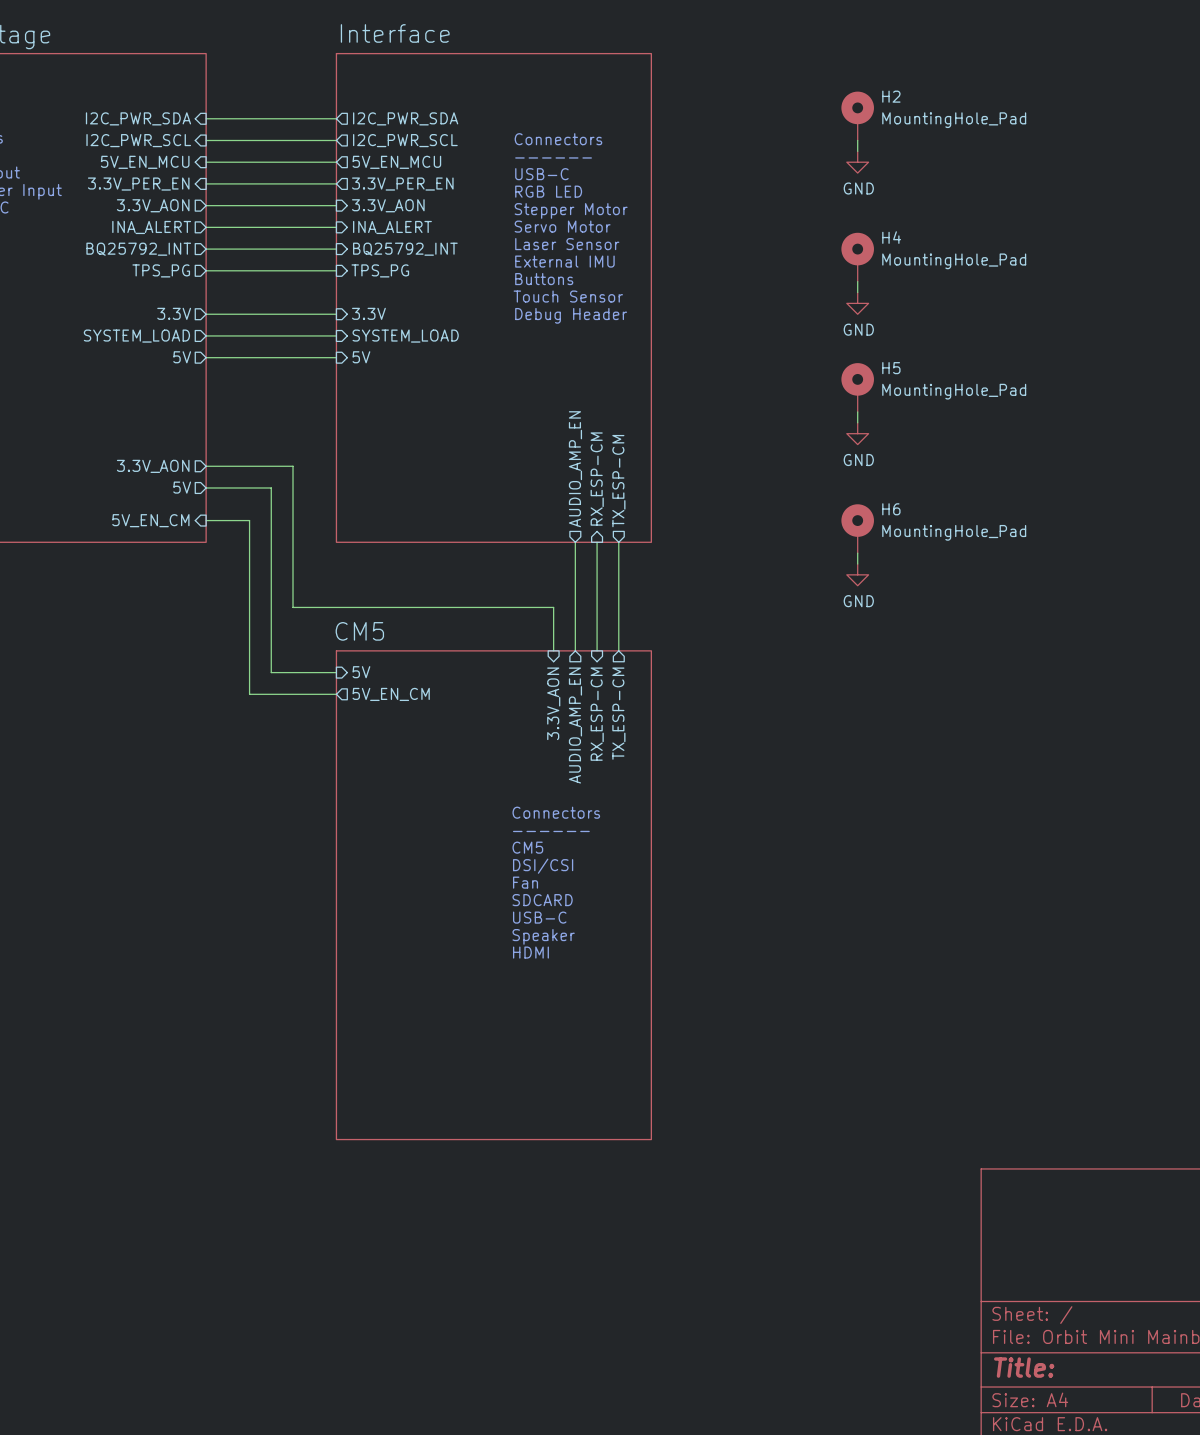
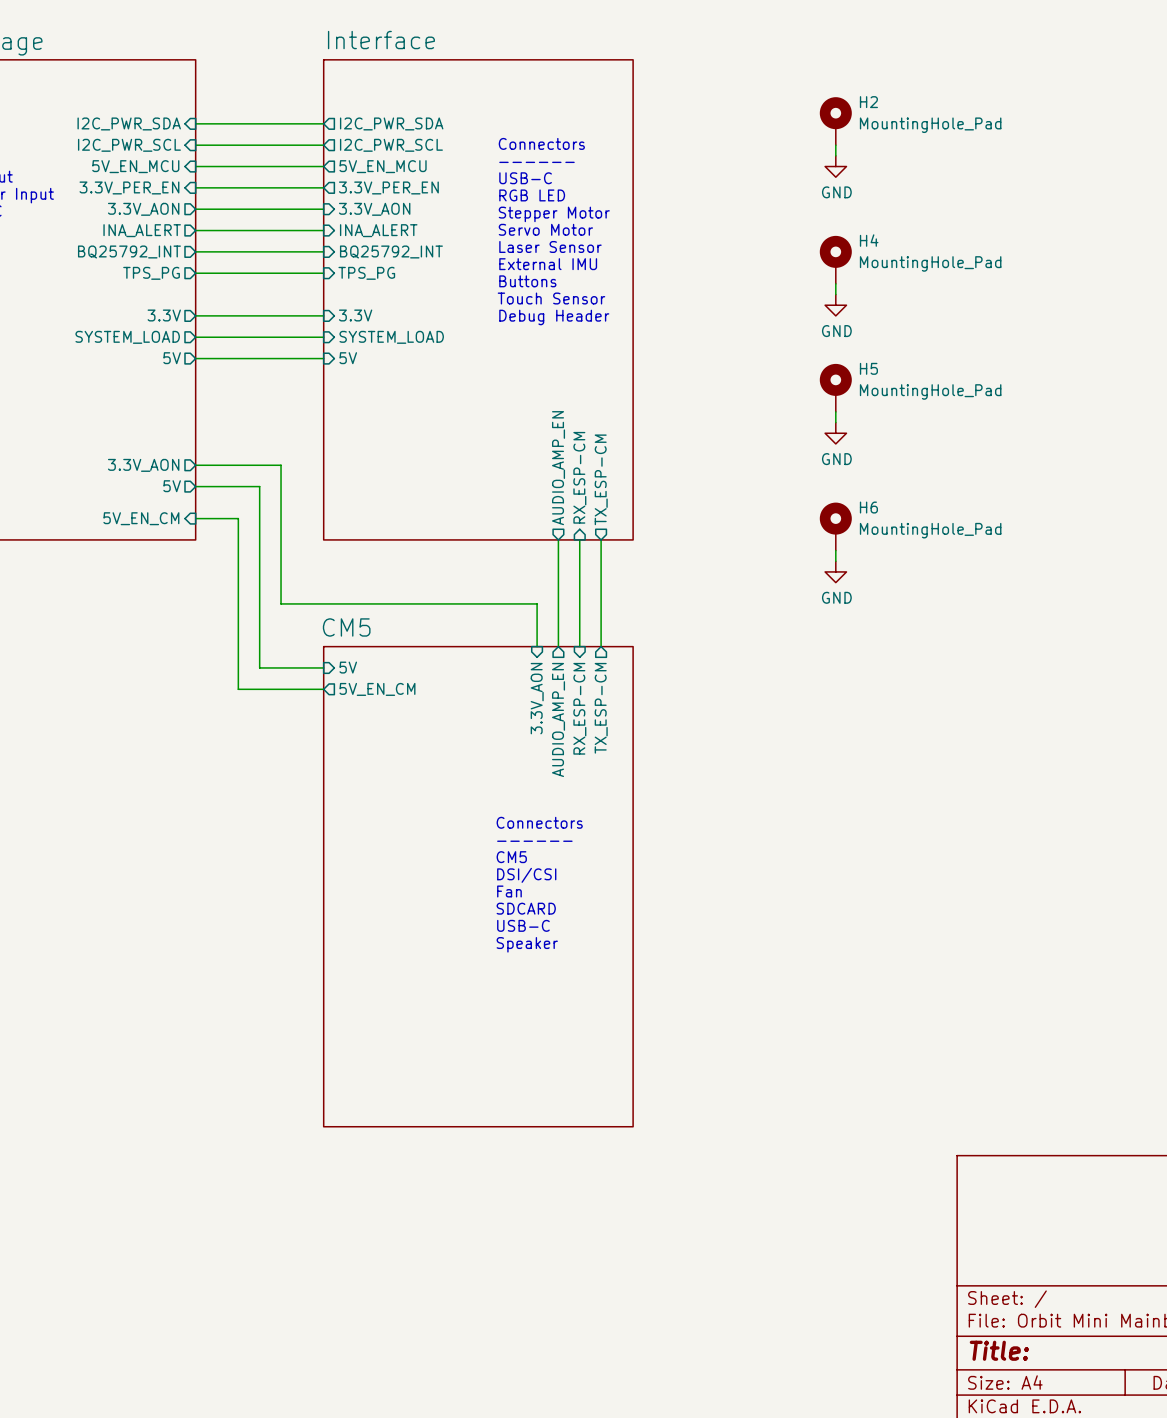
text: Connectors (556, 812) -> none
text: ------ (551, 831) -> Connectors (539, 822)
text: CM5 (527, 847) -> ------ (534, 841)
text: DSI/CSI (543, 866) -> CM5 (511, 857)
text: Fan (525, 882) -> DSI/CSI (526, 875)
text: SDCARD (542, 900) -> Fan (509, 891)
text: USB-C (539, 917) -> SDCARD (526, 908)
text: Speaker (543, 936) -> USB-C (523, 925)
text: HDMI (530, 952) -> Speaker (527, 944)

